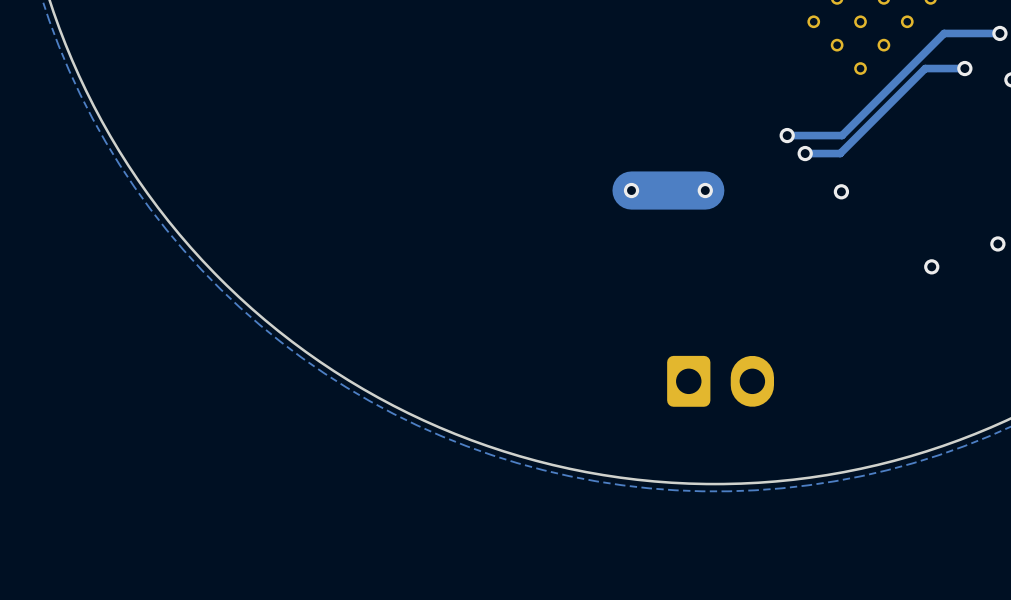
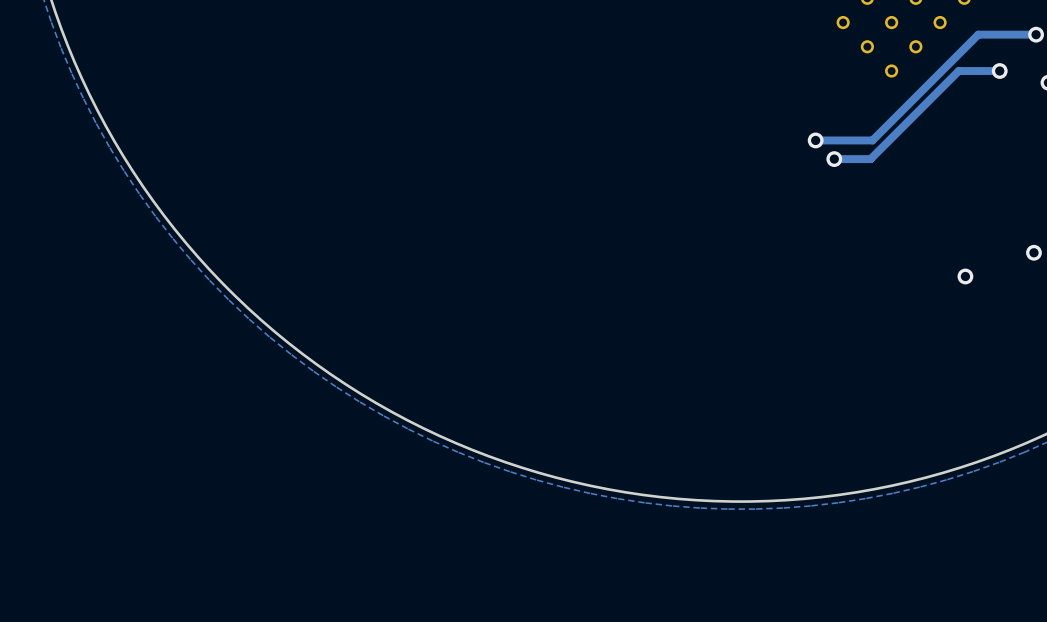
via: (631, 190) -> none
track: (705, 190) (631, 190) -> none
via: (705, 190) -> none
via: (841, 191) -> none
part: (720, 381) -> none

